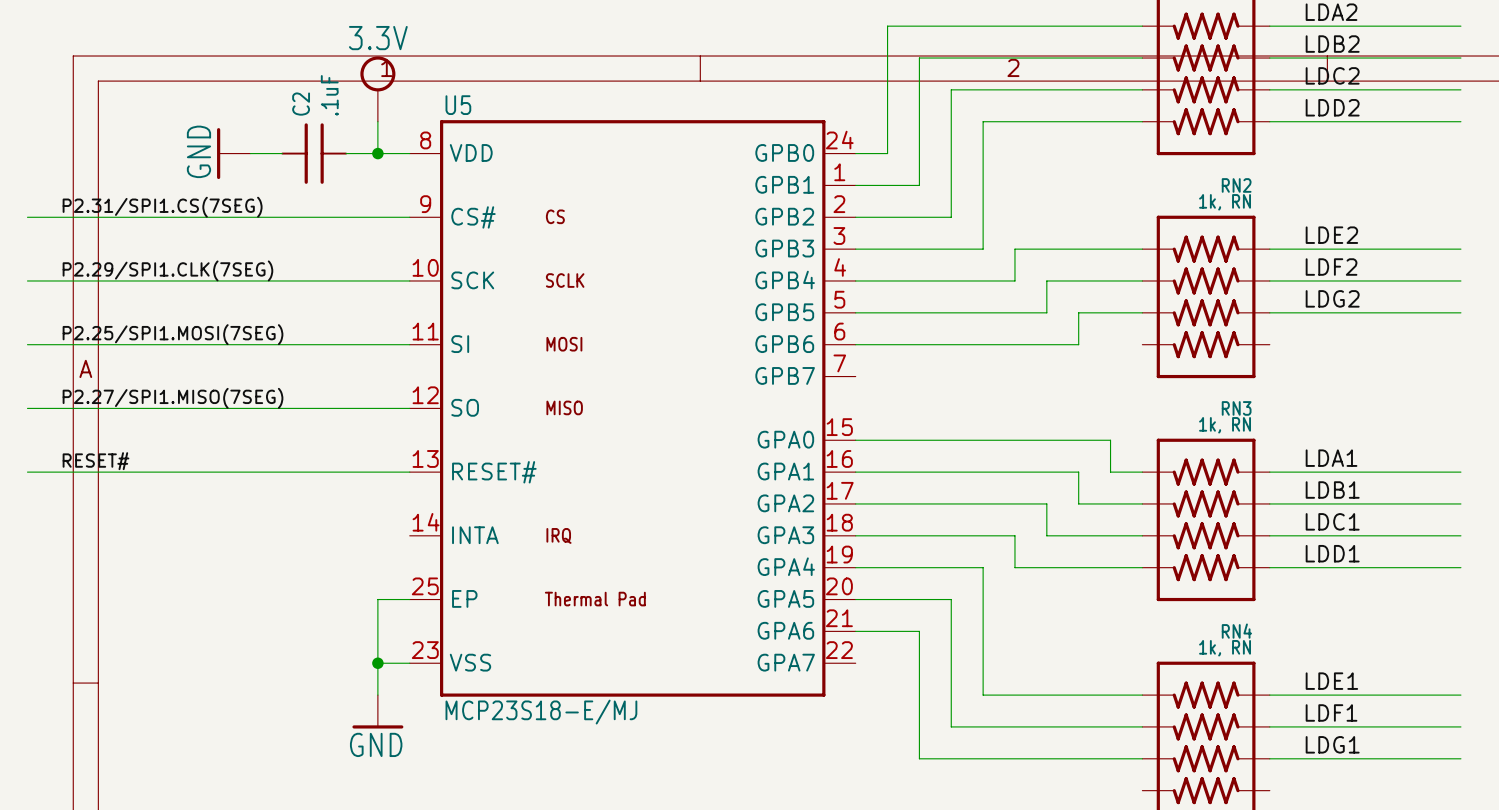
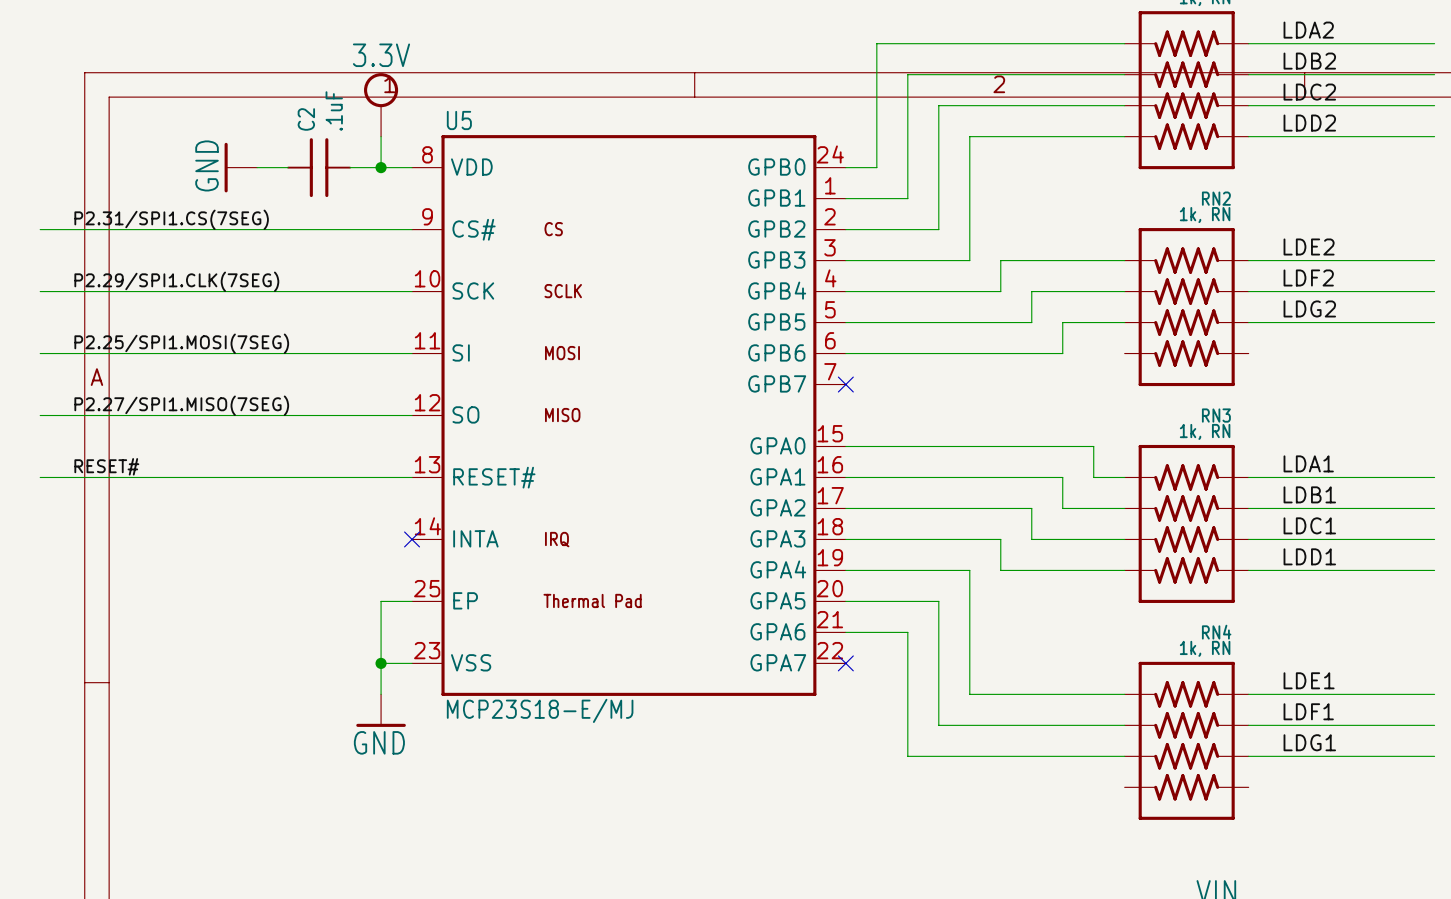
no-connect mark: none -> (845, 384)
no-connect mark: none -> (412, 539)
no-connect mark: none -> (845, 663)

